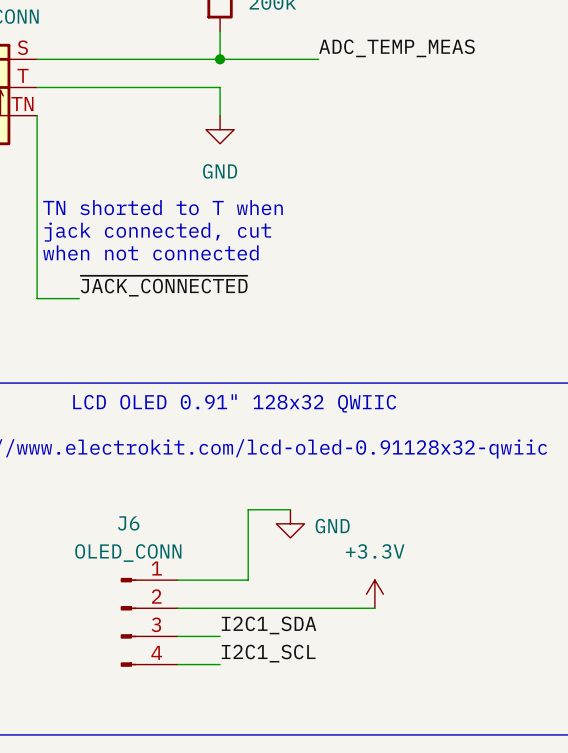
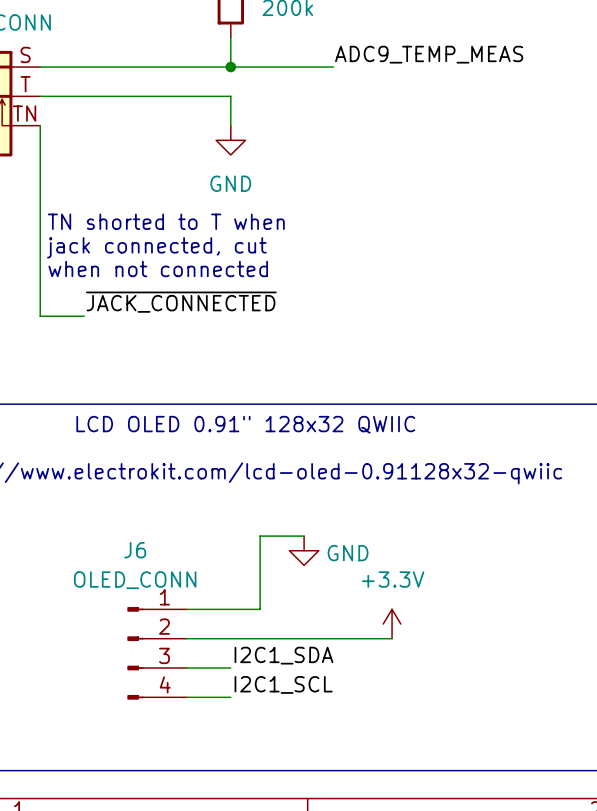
label: ADC_TEMP_MEAS (396, 48) -> ADC9_TEMP_MEAS (429, 54)

